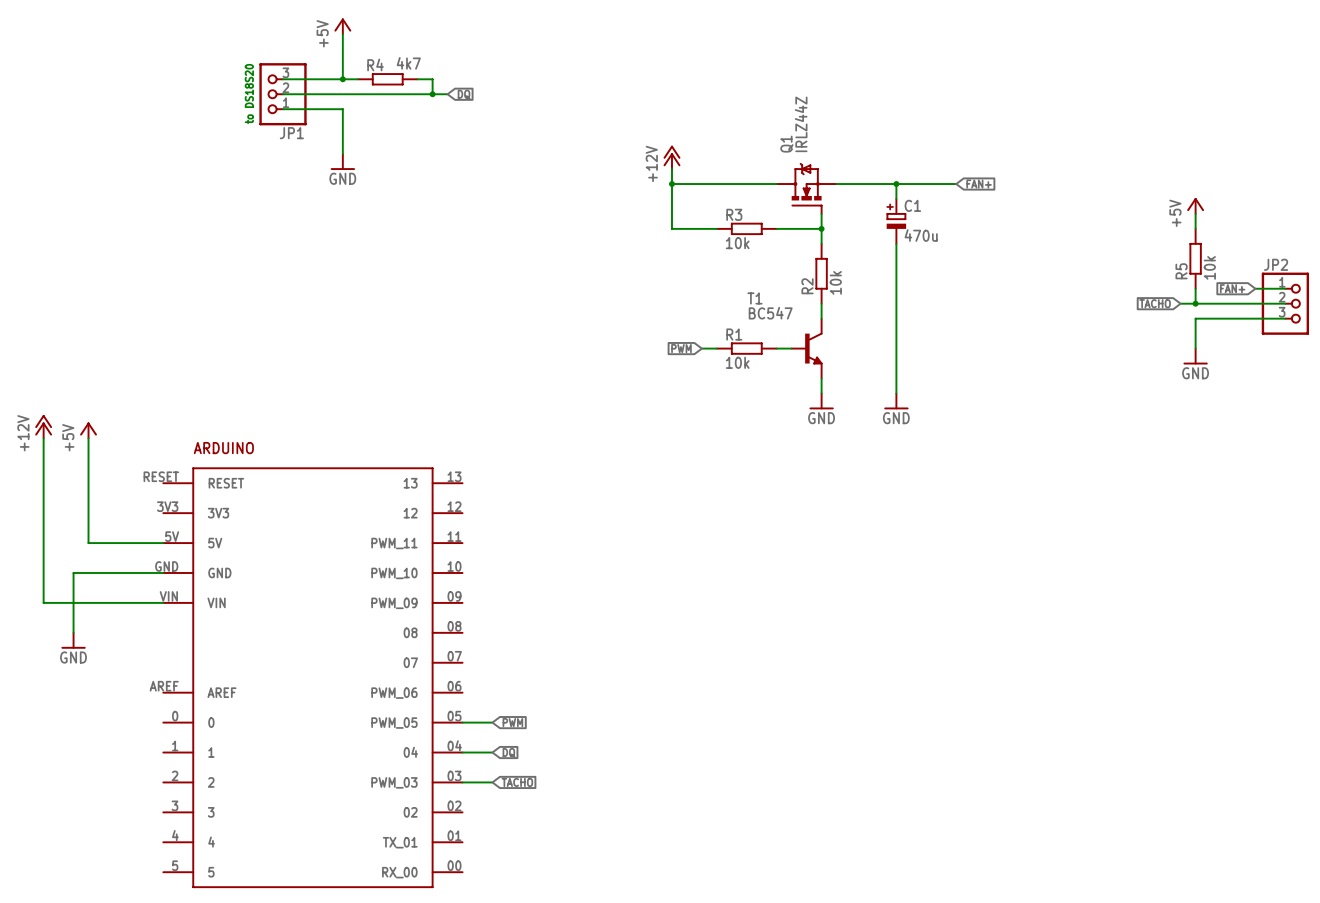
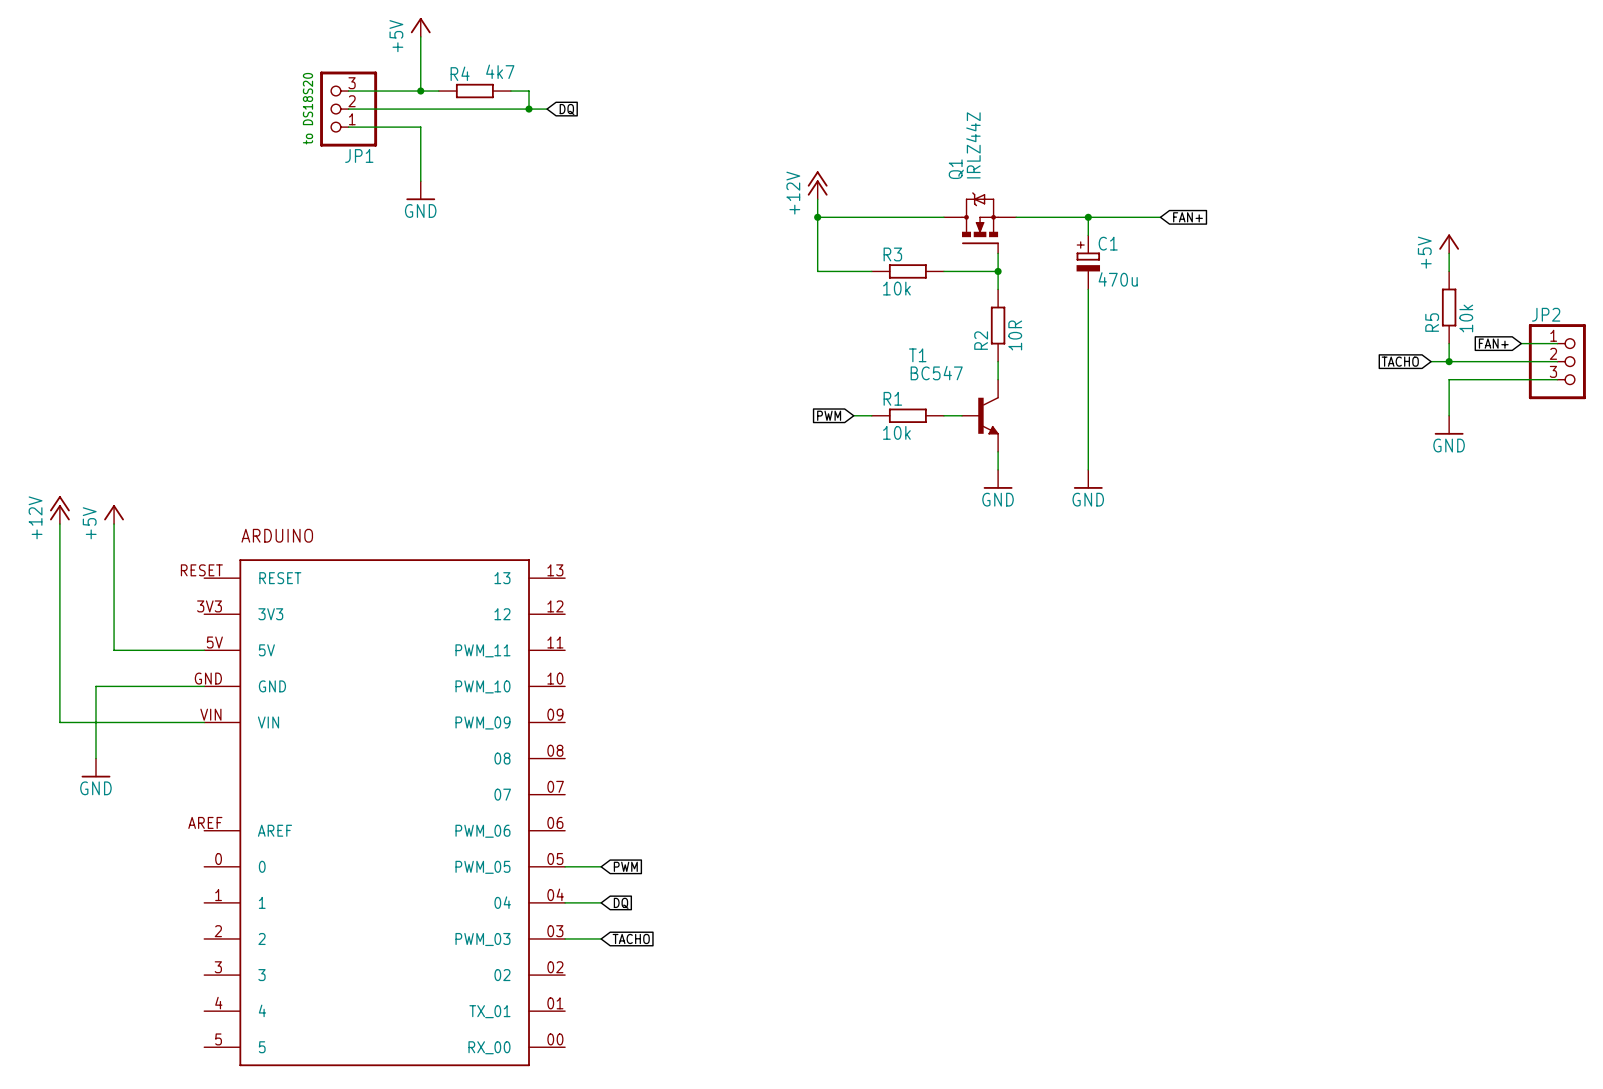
R2 value: 10k (835, 282) -> 10R (1015, 335)

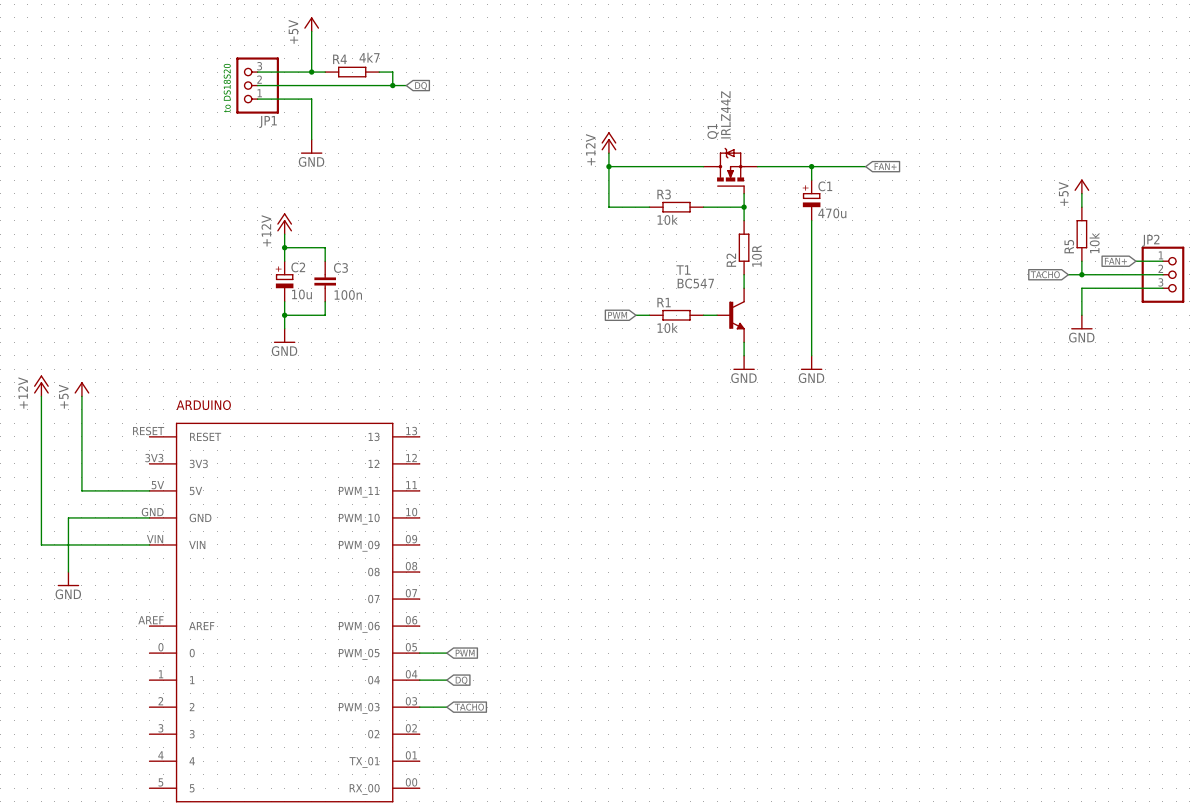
power symbol: none -> +12V (284, 223)
wire: none -> (284, 234) (284, 261)
wire: none -> (284, 247) (325, 247) (325, 261)
junction: none -> (284, 247)
C2: none -> 10u (284, 281)
C3: none -> 100n (325, 281)
wire: none -> (284, 301) (284, 328)
wire: none -> (325, 301) (325, 315) (284, 315)
junction: none -> (284, 315)
power symbol: none -> GND (284, 335)

